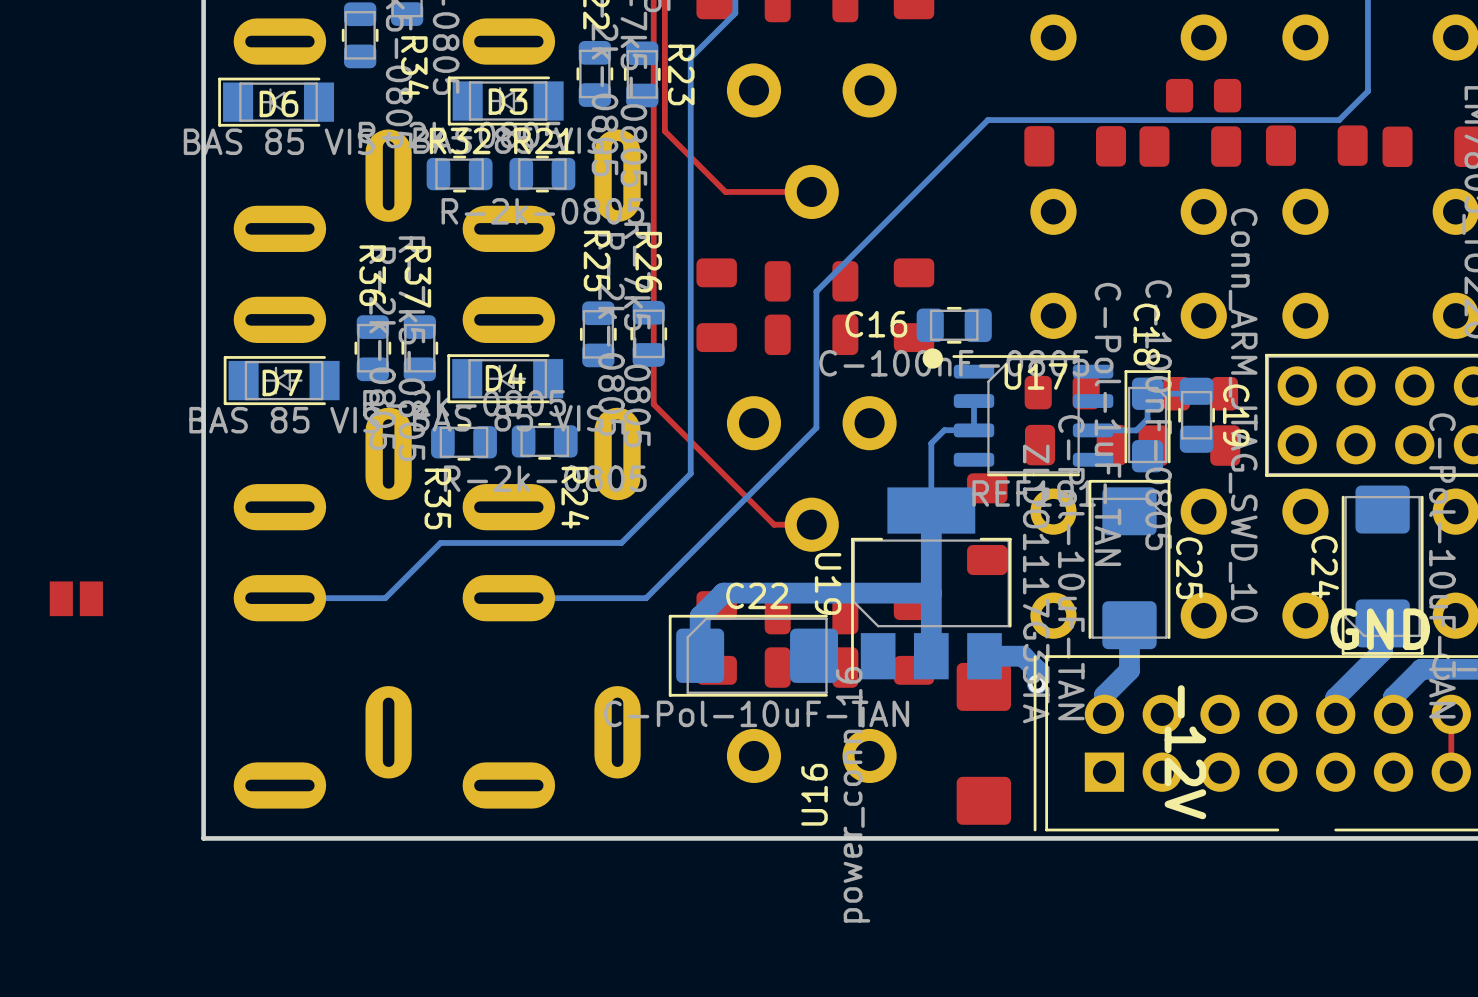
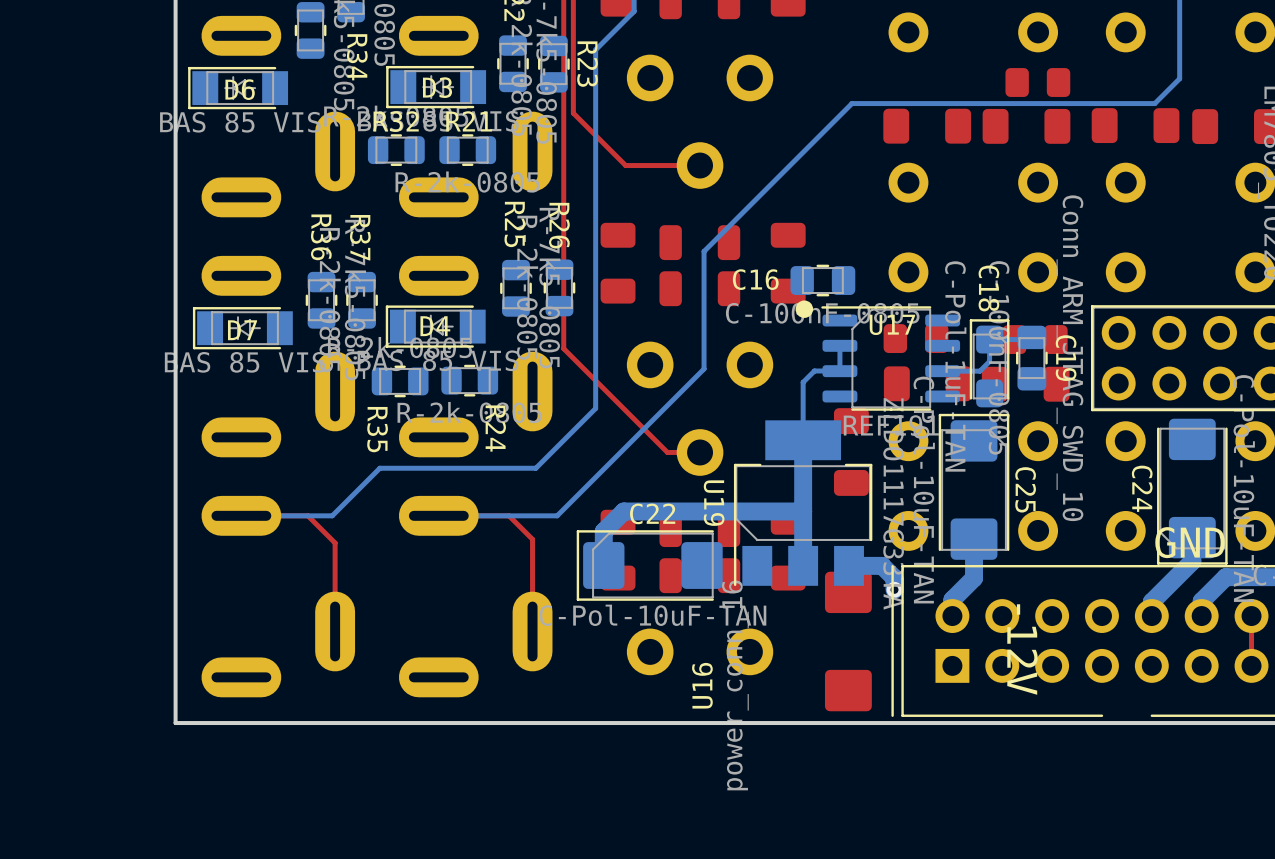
part: (76, 598) -> none
top track: none -> (241, 515) (307, 515) (335, 543) (335, 631)
top track: none -> (438, 515) (509, 515) (532, 539) (532, 631)

